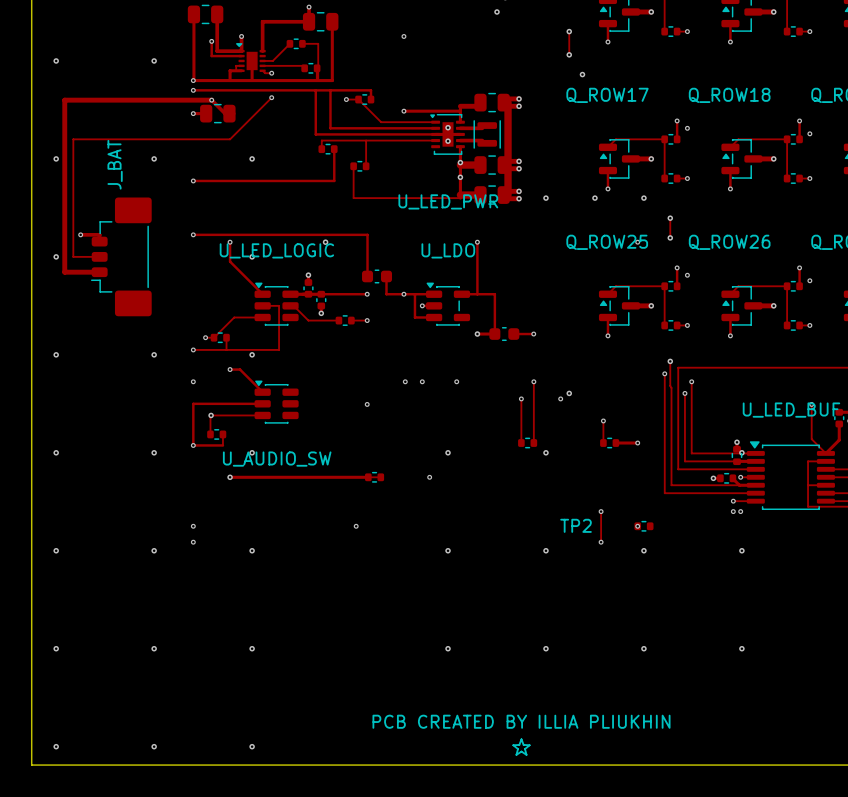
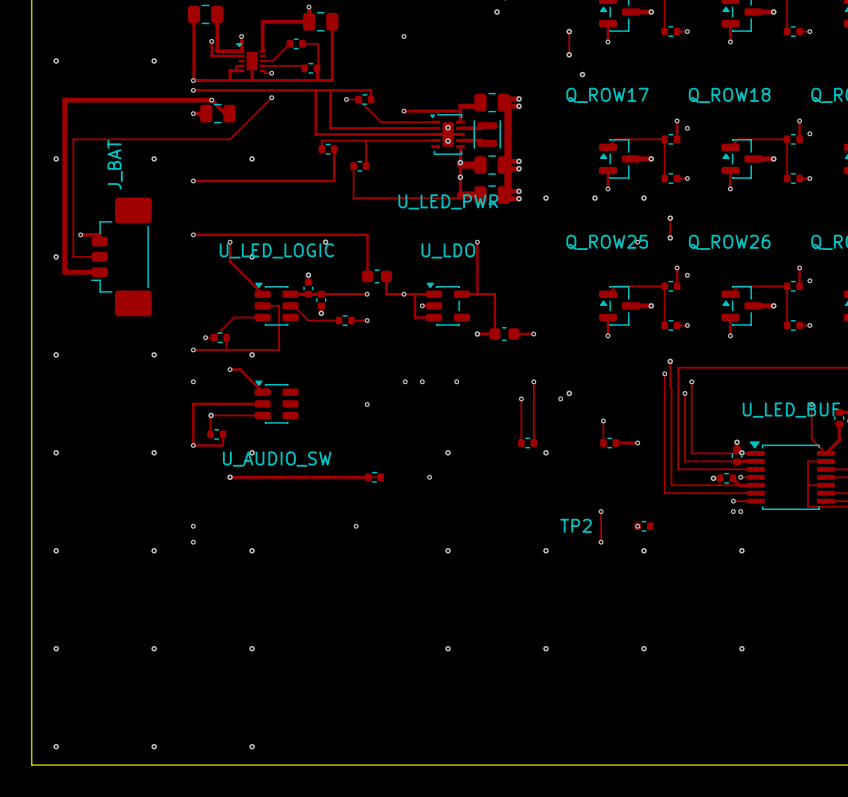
text: PCB CREATED BY ILLIA PLIUKHIN (521, 721) -> none
line: (521, 739) (519, 744) (513, 745) (518, 749) (516, 754) (521, 751) (526, 754) (524, 749) (529, 745) (523, 744) (521, 739) -> none

